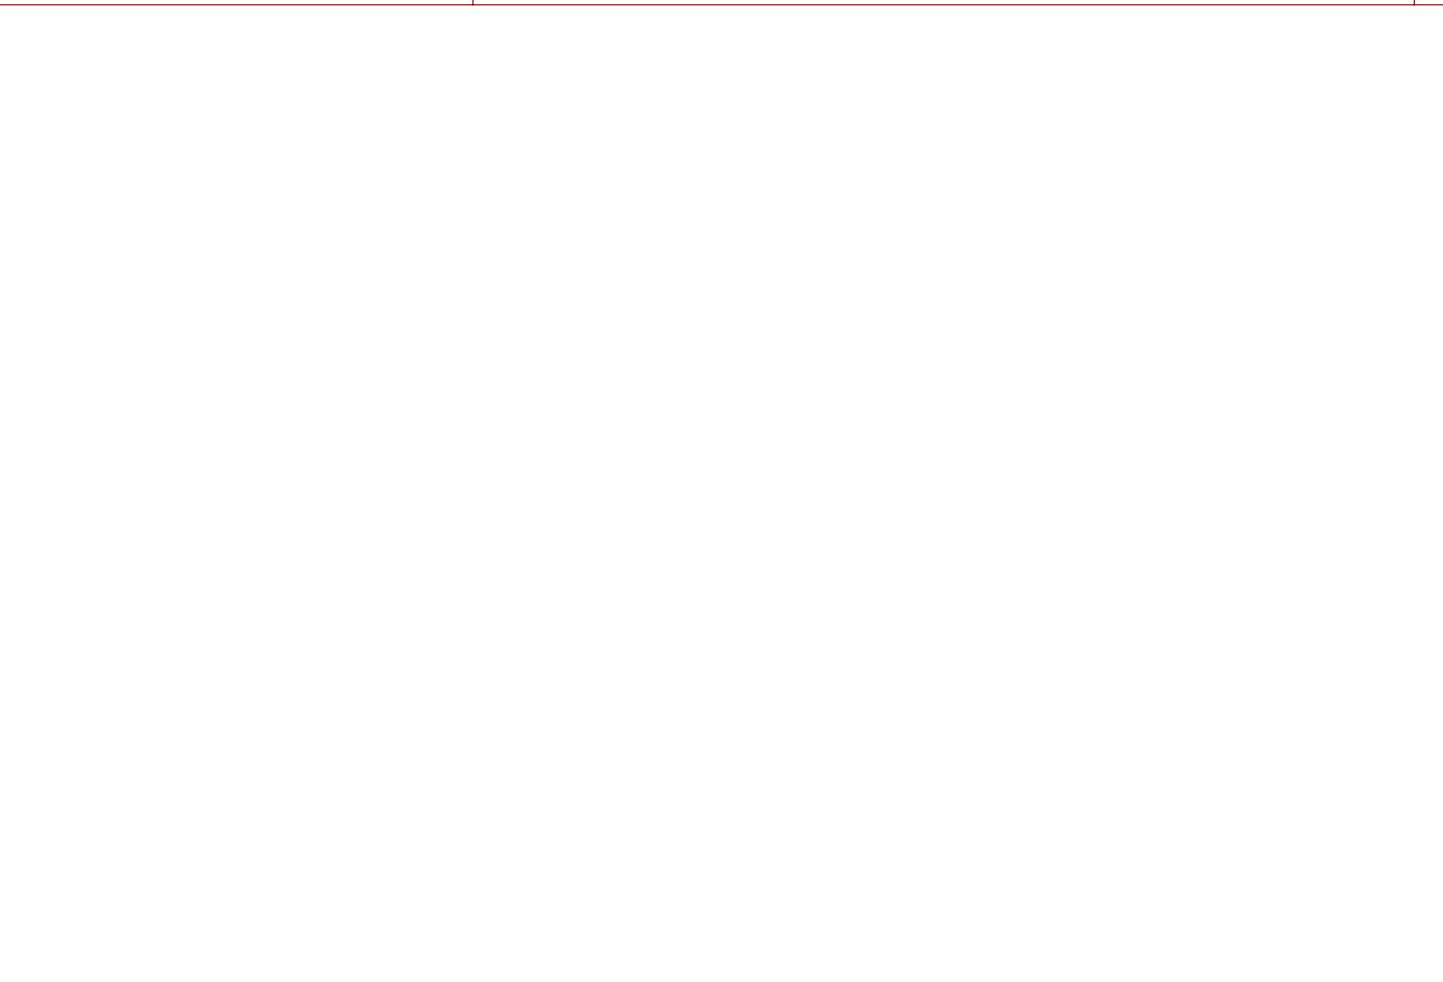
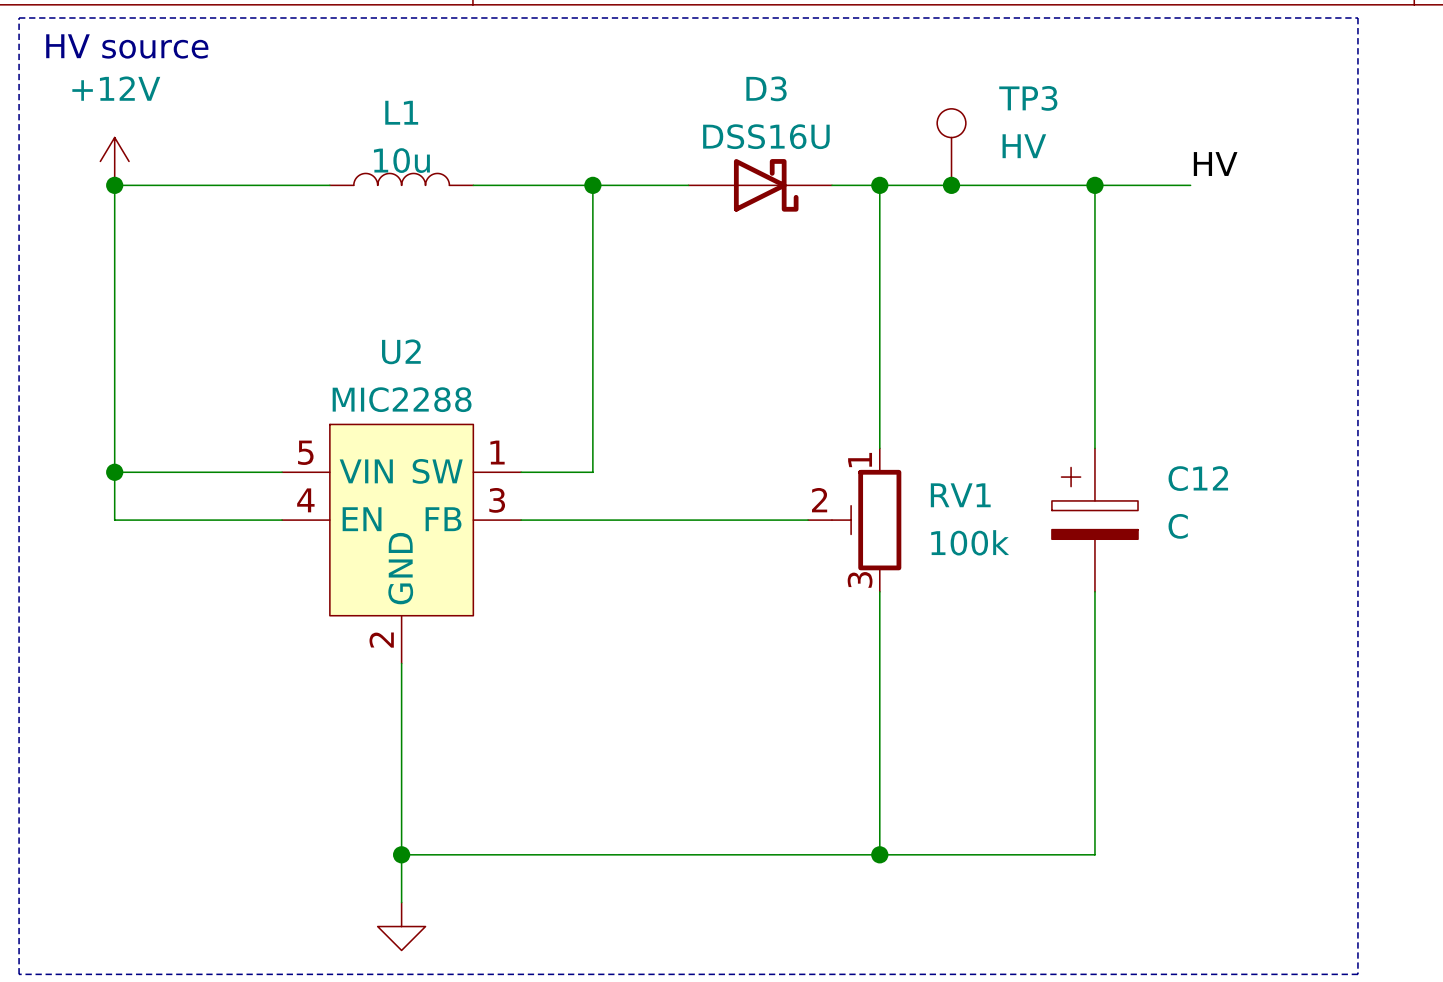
line: none -> (19, 17) (1357, 17) (1357, 974) (19, 974) (19, 17)
text: none -> HV source (127, 46)
TP3: none -> HV (951, 147)
power symbol: none -> +12V (114, 161)
label: none -> HV (1215, 164)
L1: none -> 10u (401, 179)
junction: none -> (114, 185)
wire: none -> (329, 185) (114, 185) (114, 520) (282, 520)
wire: none -> (473, 185) (688, 185)
wire: none -> (592, 185) (592, 472) (521, 472)
junction: none -> (592, 185)
D3: none -> DSS16U (760, 185)
wire: none -> (831, 185) (1190, 185)
wire: none -> (879, 185) (879, 448)
junction: none -> (879, 185)
junction: none -> (951, 185)
wire: none -> (1094, 185) (1094, 448)
junction: none -> (1094, 185)
wire: none -> (114, 472) (282, 472)
junction: none -> (114, 472)
wire: none -> (521, 520) (808, 520)
RV1: none -> 100k (854, 520)
C12: none -> C (1094, 520)
U2: none -> MIC2288 (401, 544)
wire: none -> (879, 591) (879, 854)
wire: none -> (1094, 591) (1094, 854) (401, 854)
wire: none -> (401, 663) (401, 902)
junction: none -> (401, 854)
junction: none -> (879, 854)
power symbol: none -> (401, 926)

